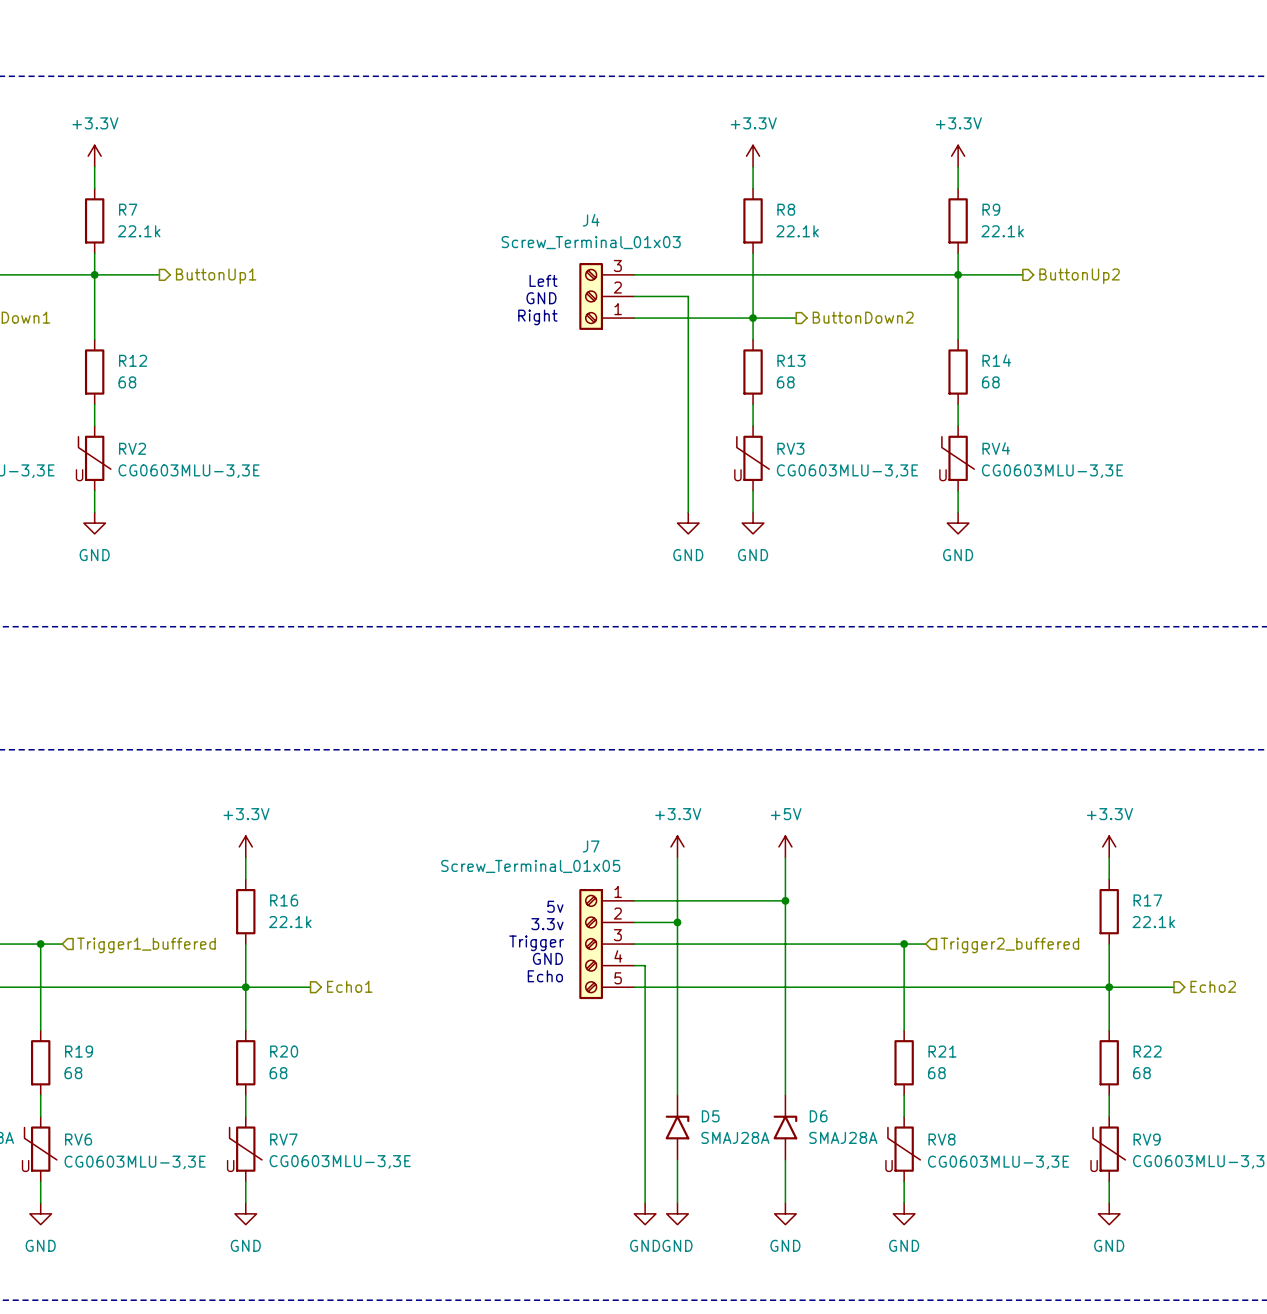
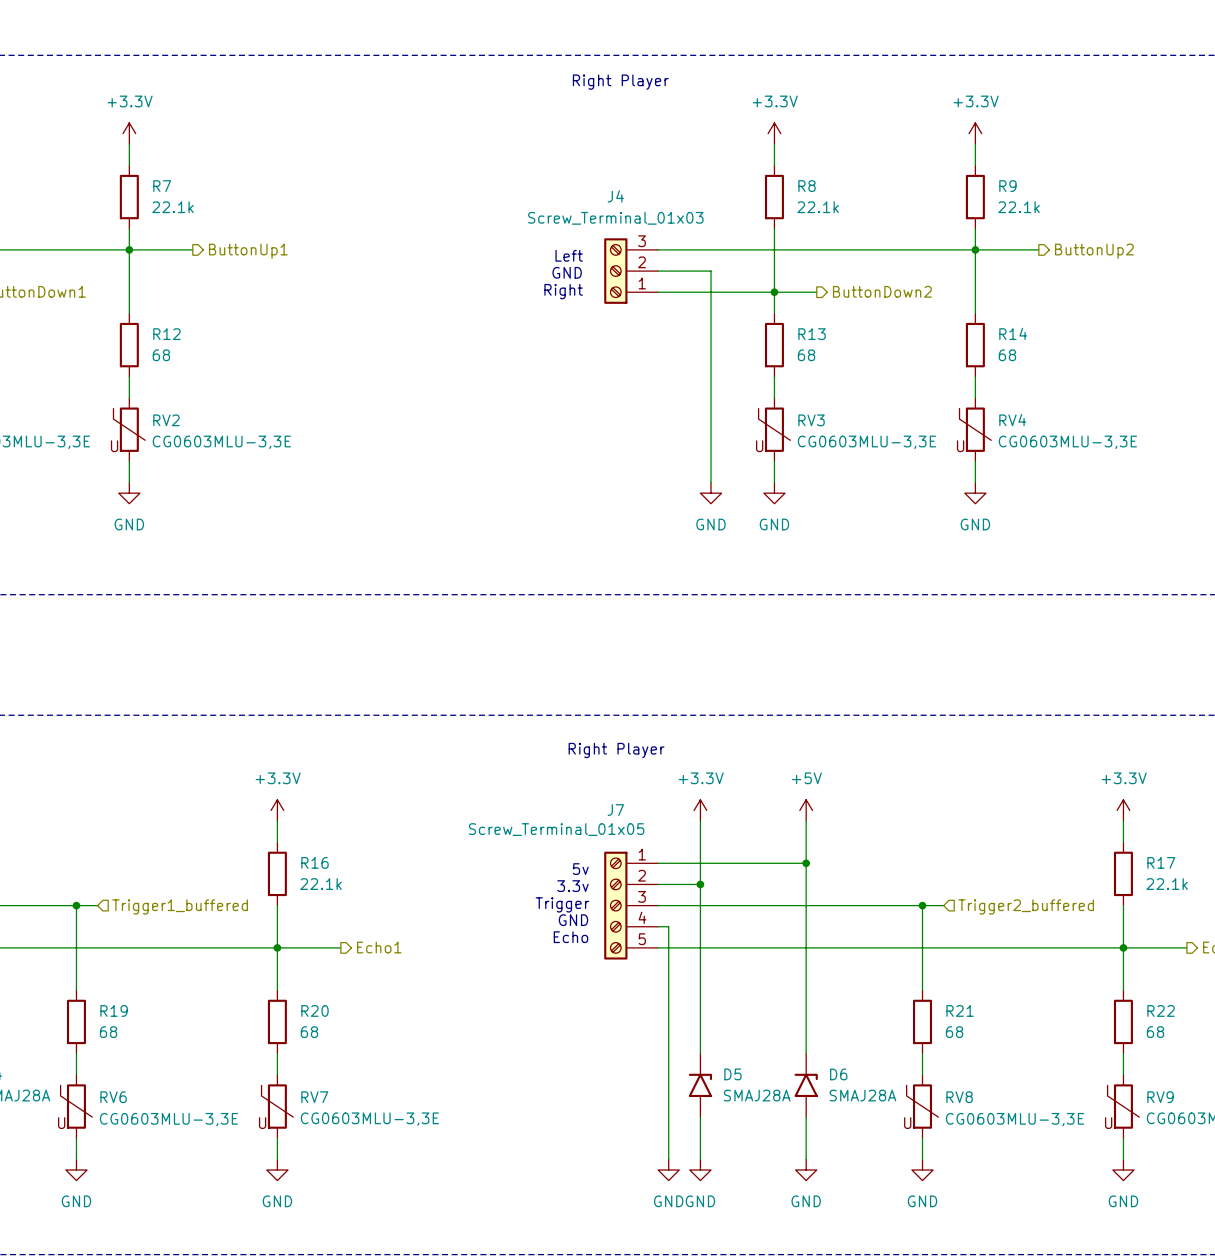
text: none -> Right Player (620, 82)
text: none -> Right Player (616, 750)

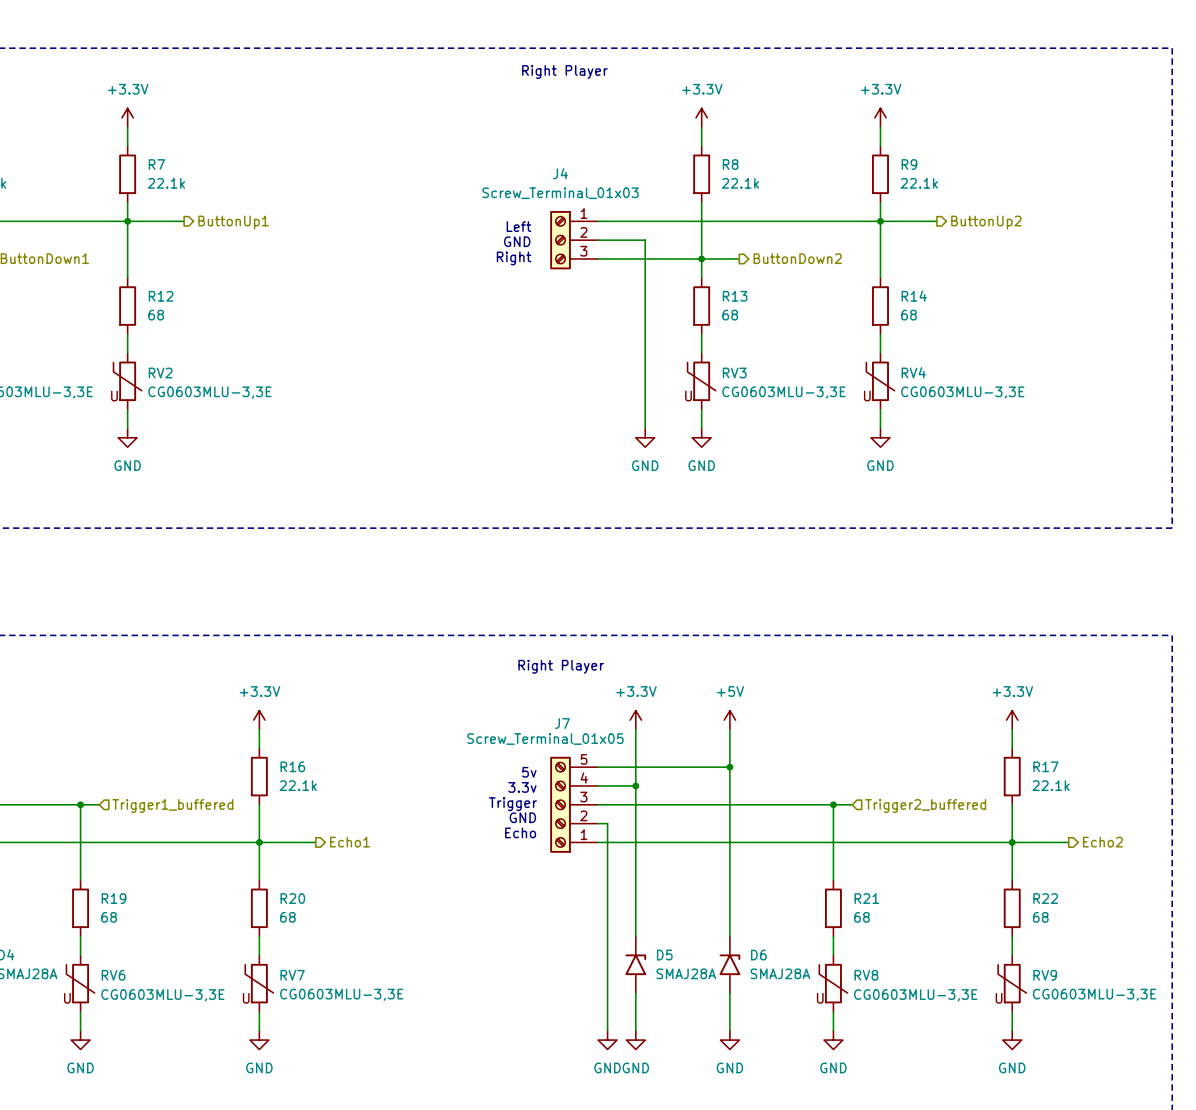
J4 flip: as is (615, 271) -> up-down (560, 240)
J7 value position: Screw_Terminal_01x05 (556, 829) -> Screw_Terminal_01x05 (545, 739)
J7 flip: as is (615, 905) -> up-down (560, 804)

